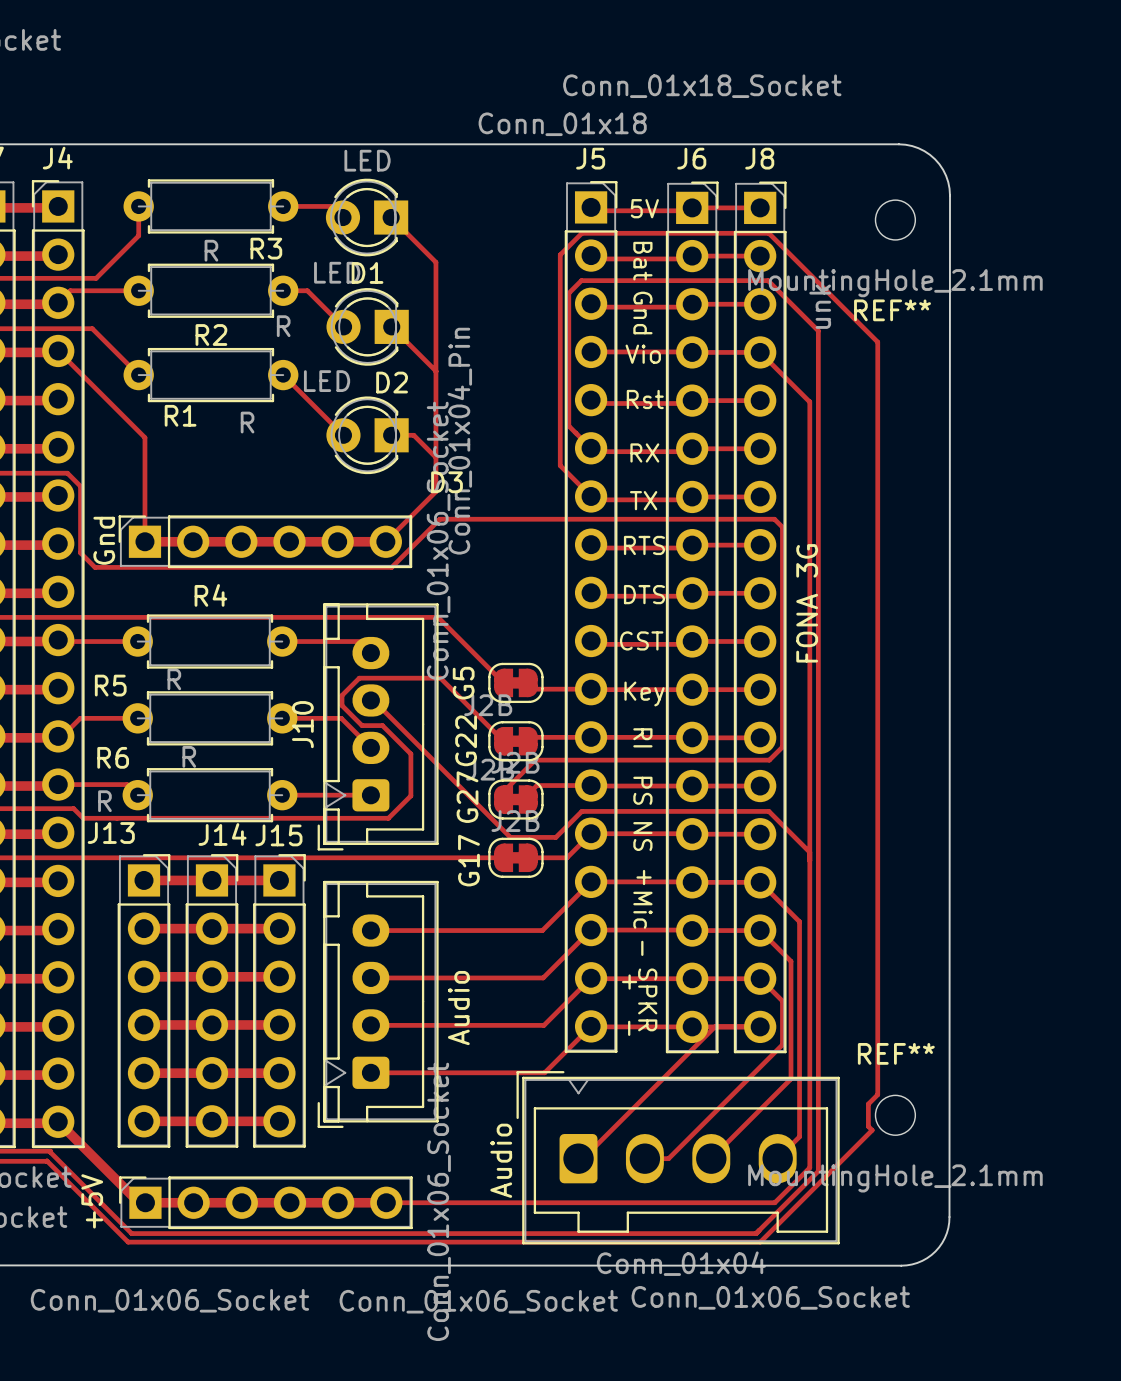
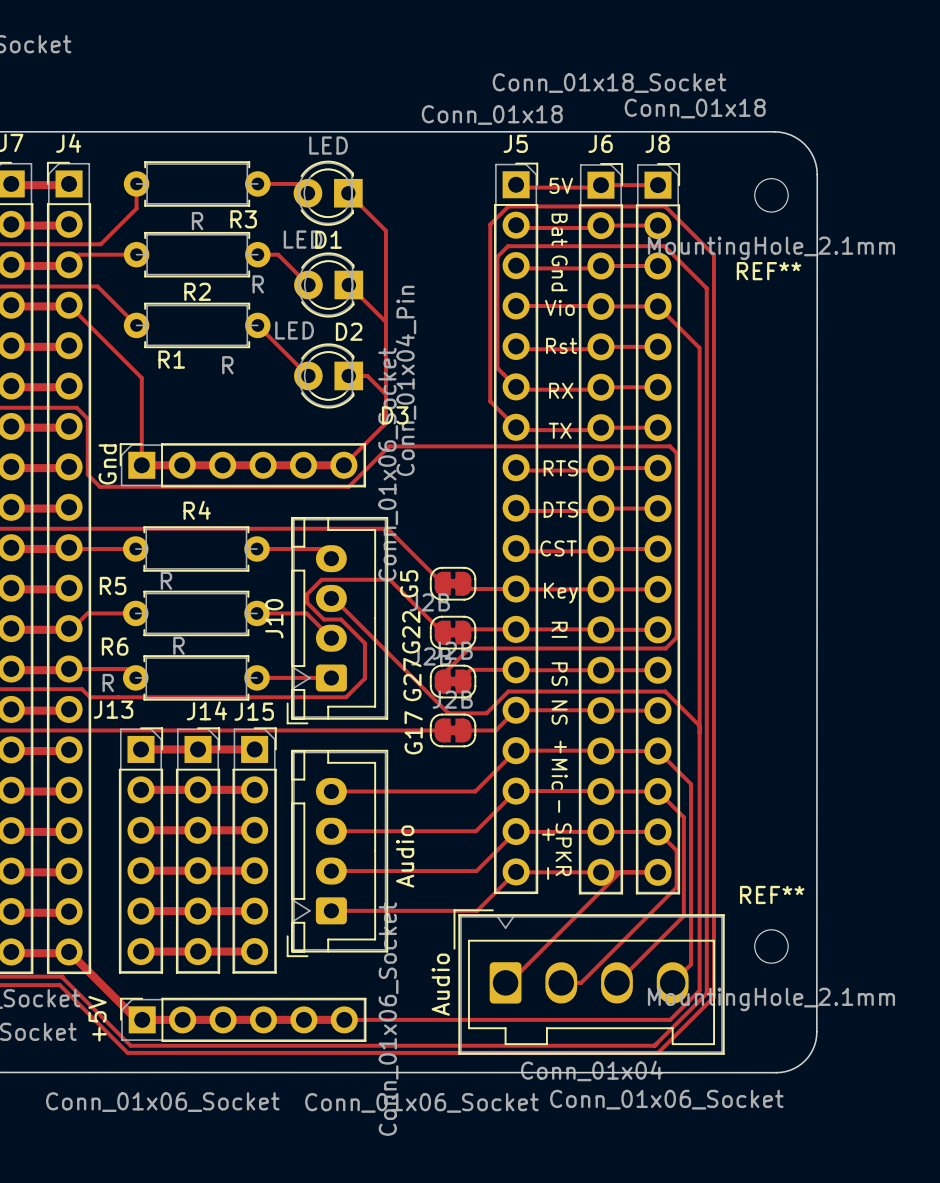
top track: (826, 291) (877, 342) (877, 1094) (868, 1104) (868, 1126) (872, 1130) (826, 1175) -> (713, 255) (713, 997)
J8 value: unk (820, 306) -> Conn_01x18 (695, 108)
text: FONA 3G (807, 603) -> none

